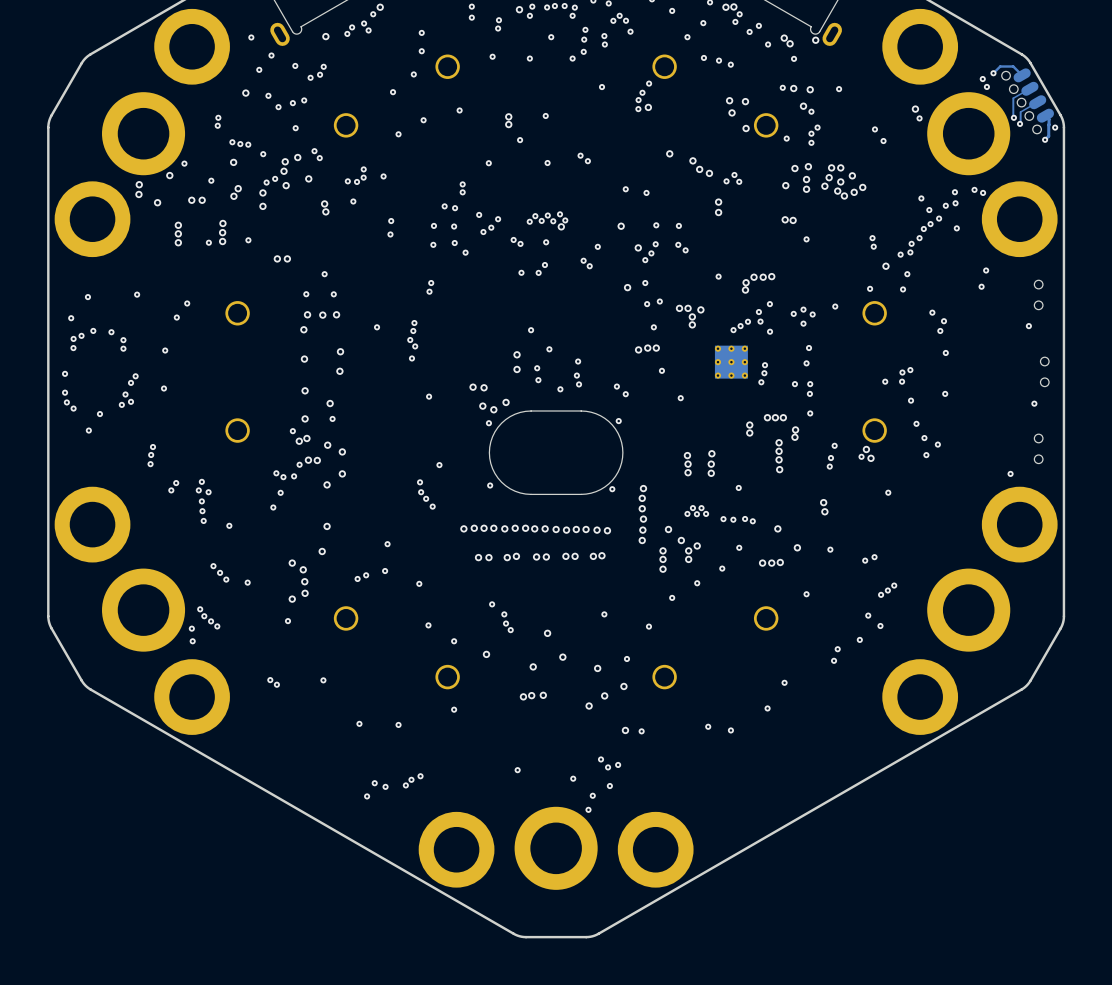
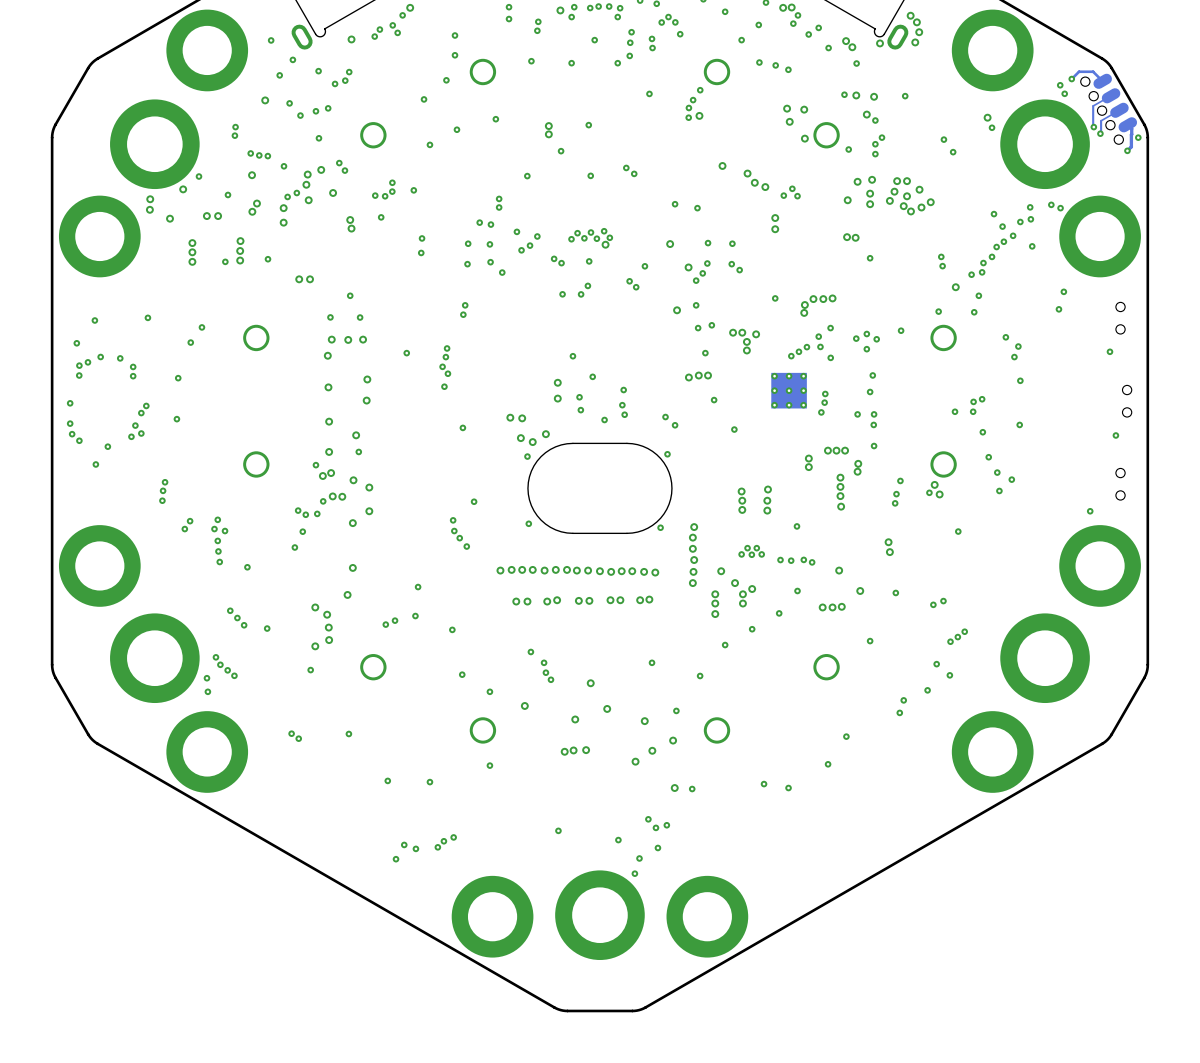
via: none -> (910, 15)
via: none -> (916, 22)
via: none -> (919, 32)
via: none -> (915, 42)

